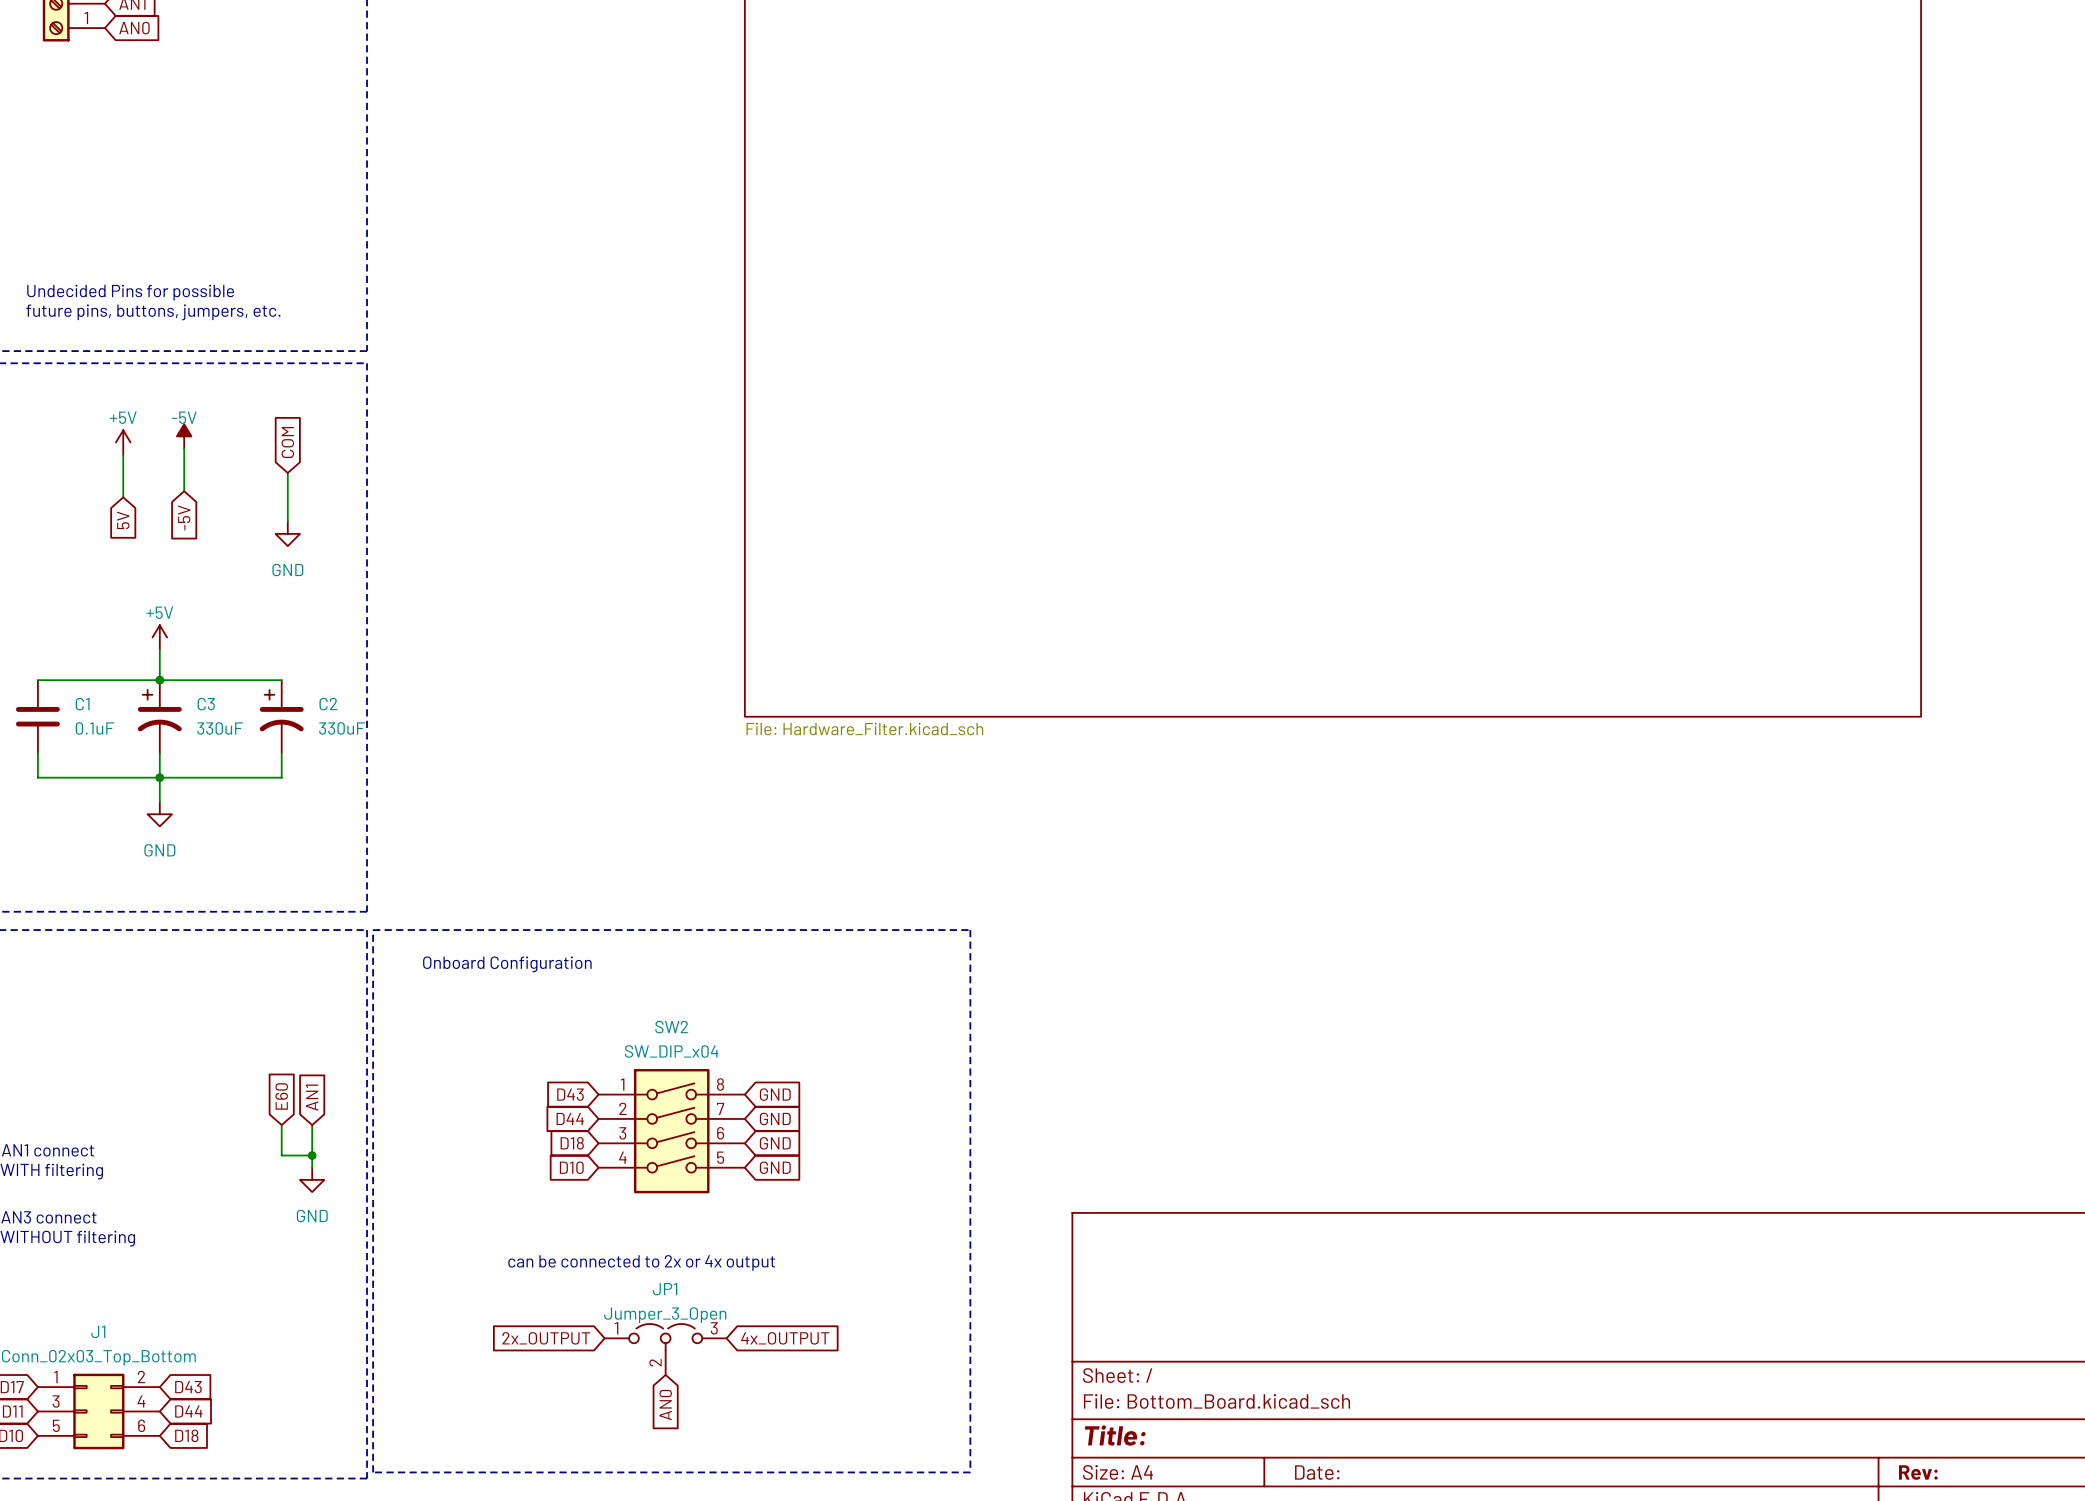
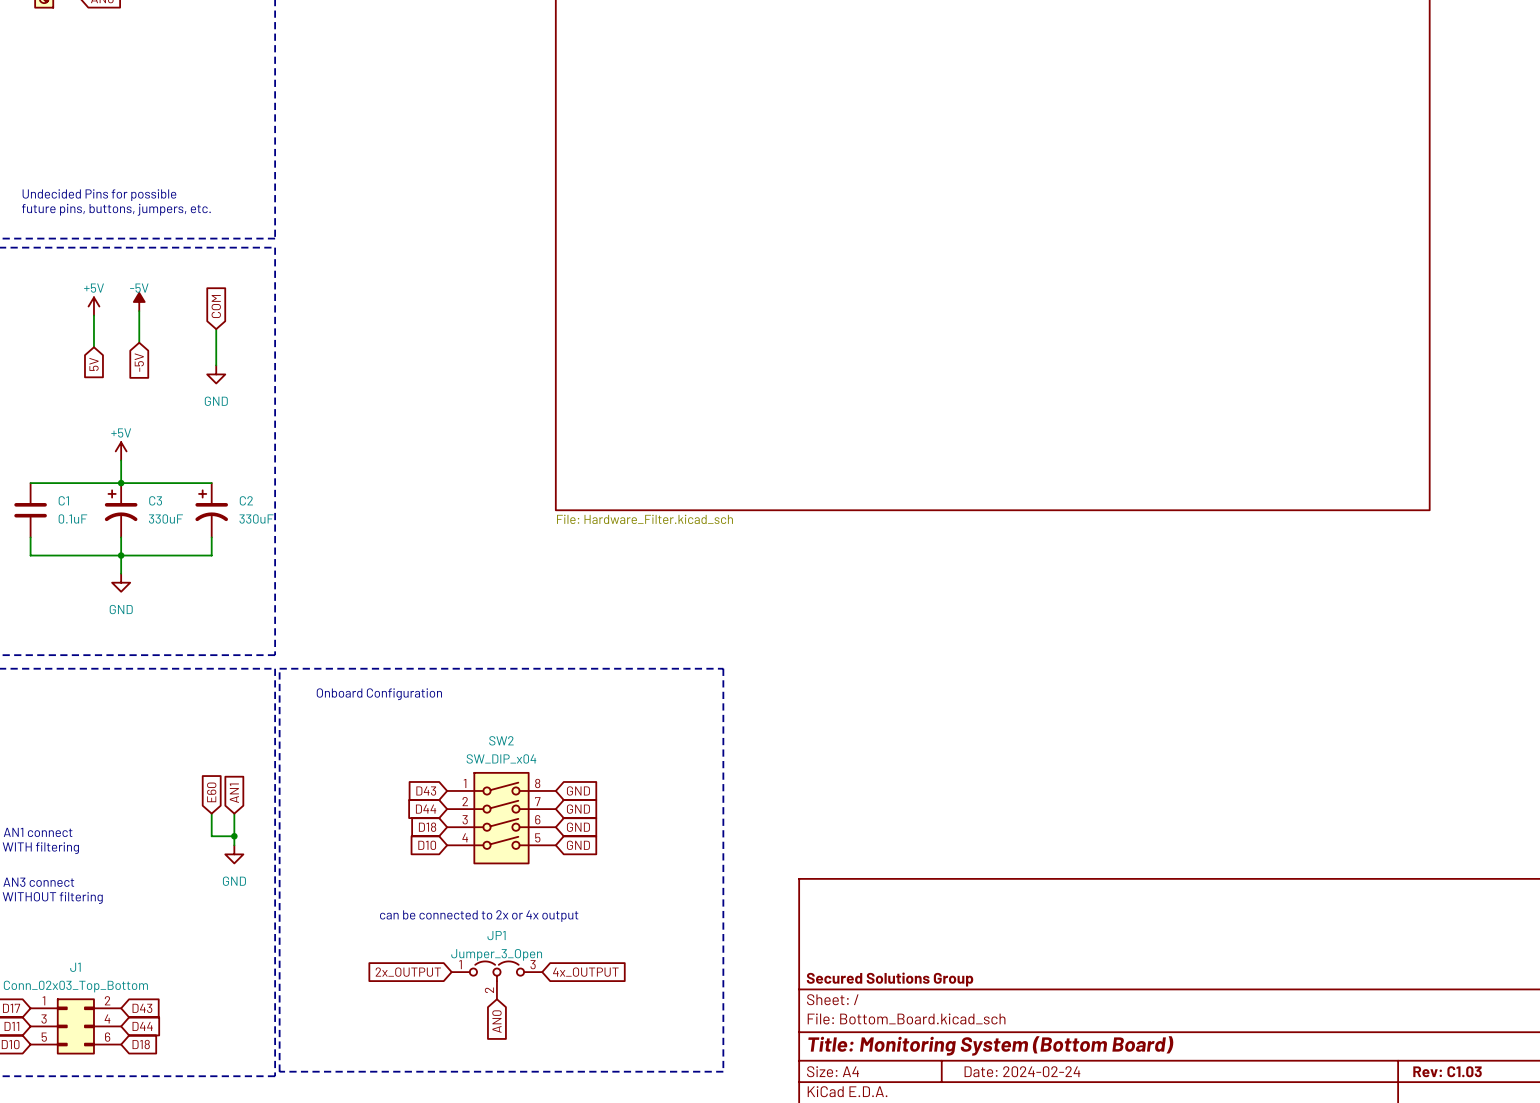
title block: none -> Secured Solutions Group (890, 979)
title block: Title: (1115, 1435) -> Title: Monitoring System (Bottom Board) (990, 1045)
title block: Date: (1317, 1472) -> Date: 2024-02-24 (1022, 1071)
title block: Rev: (1918, 1472) -> Rev: C1.03 (1447, 1071)

